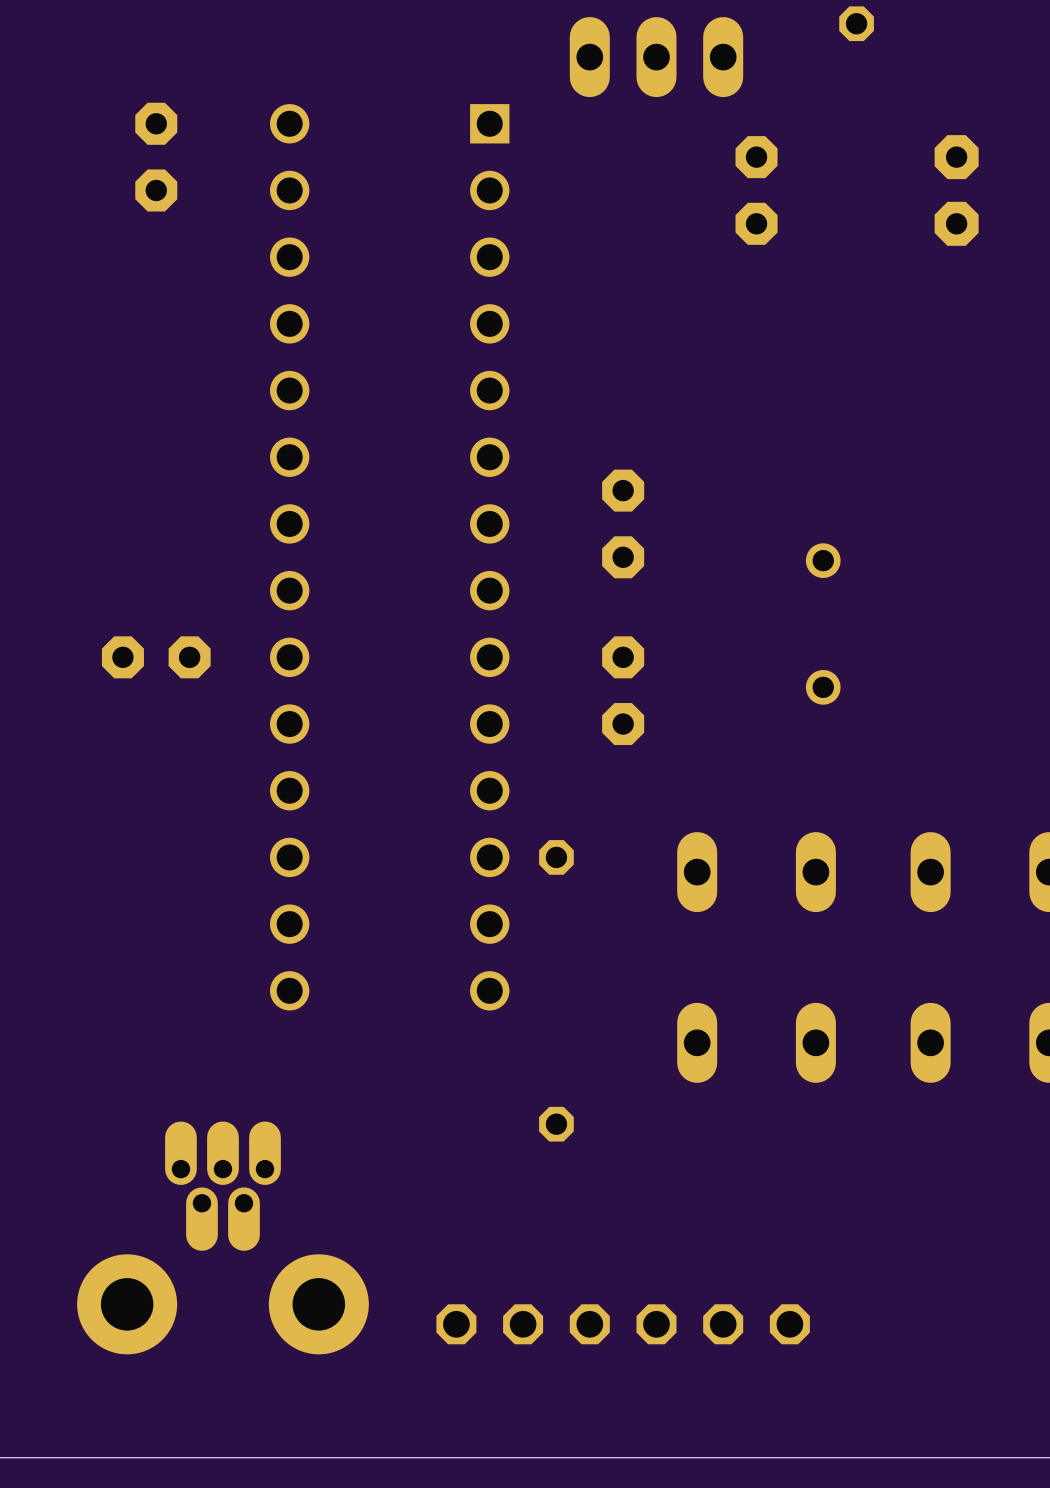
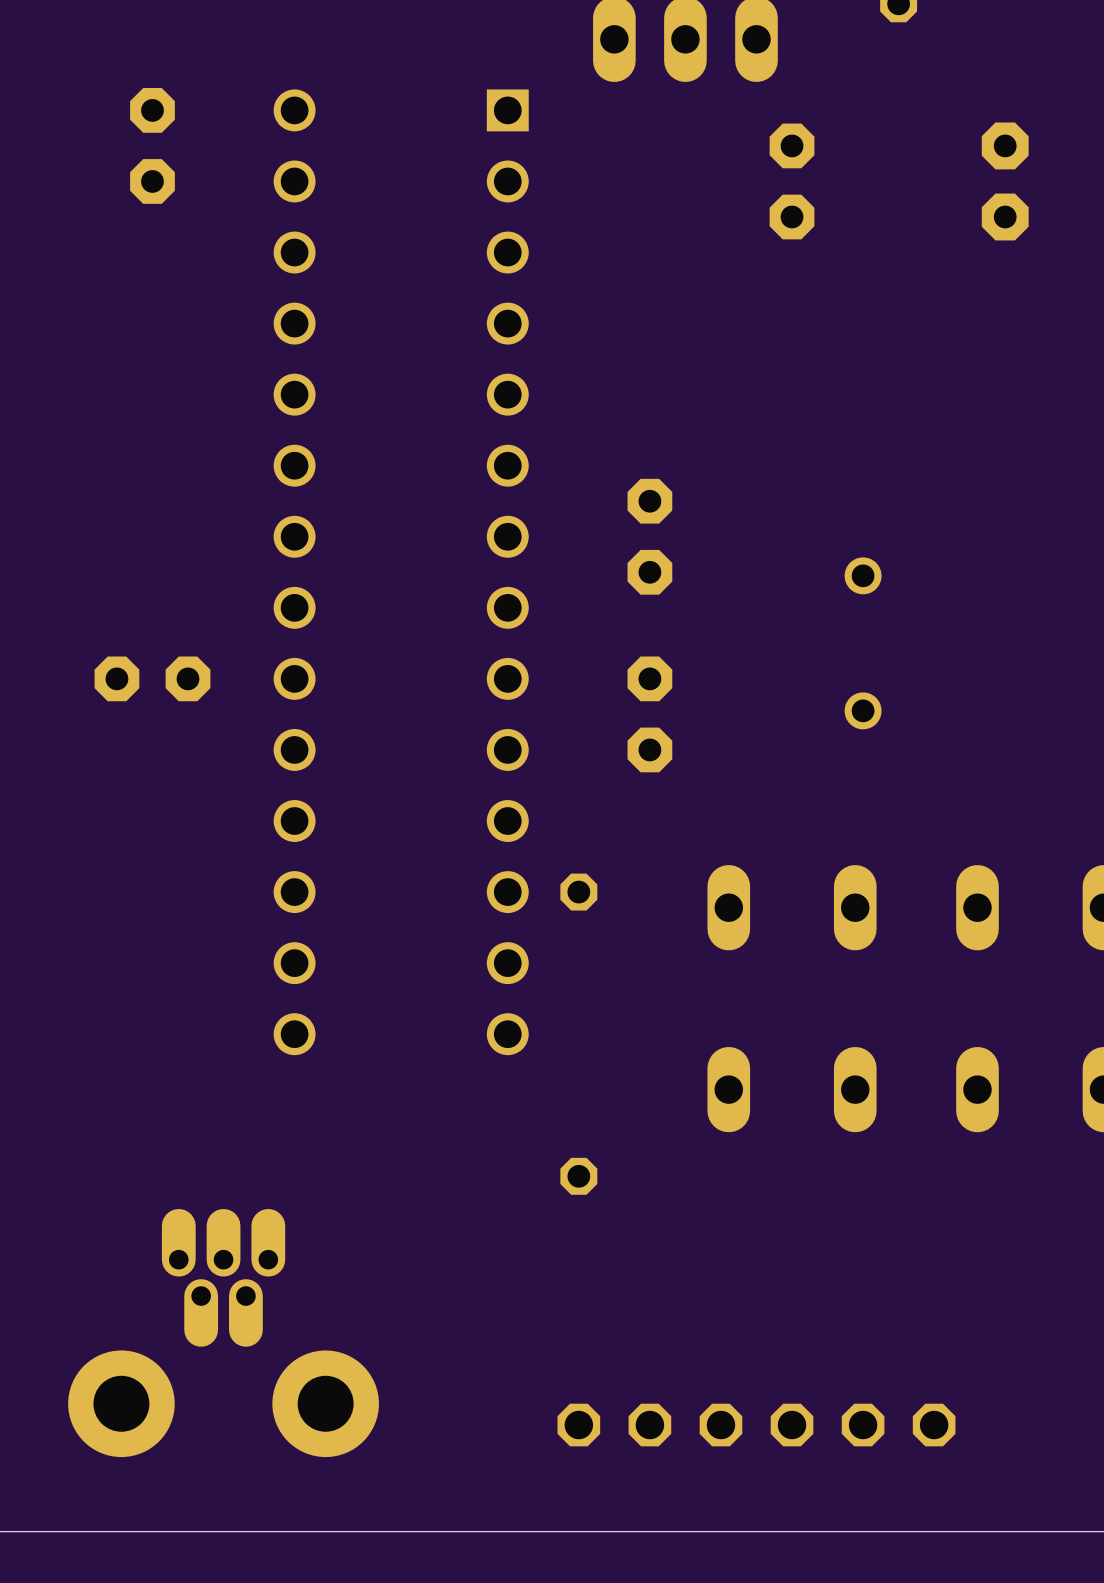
part position: (222, 1237) -> (223, 1333)
part position: (623, 1324) -> (756, 1425)

